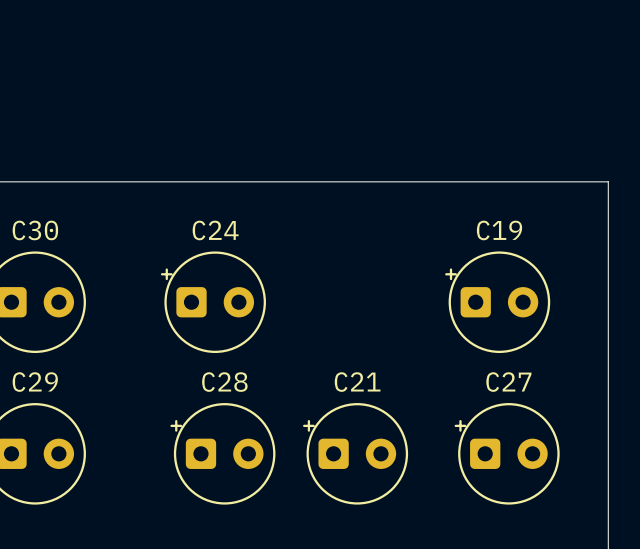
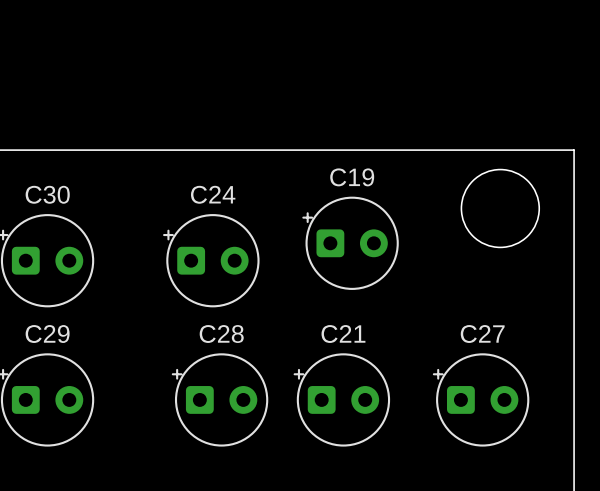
round board edge: none -> [460, 169, 540, 248]
C19 position: (497, 302) -> (350, 243)

